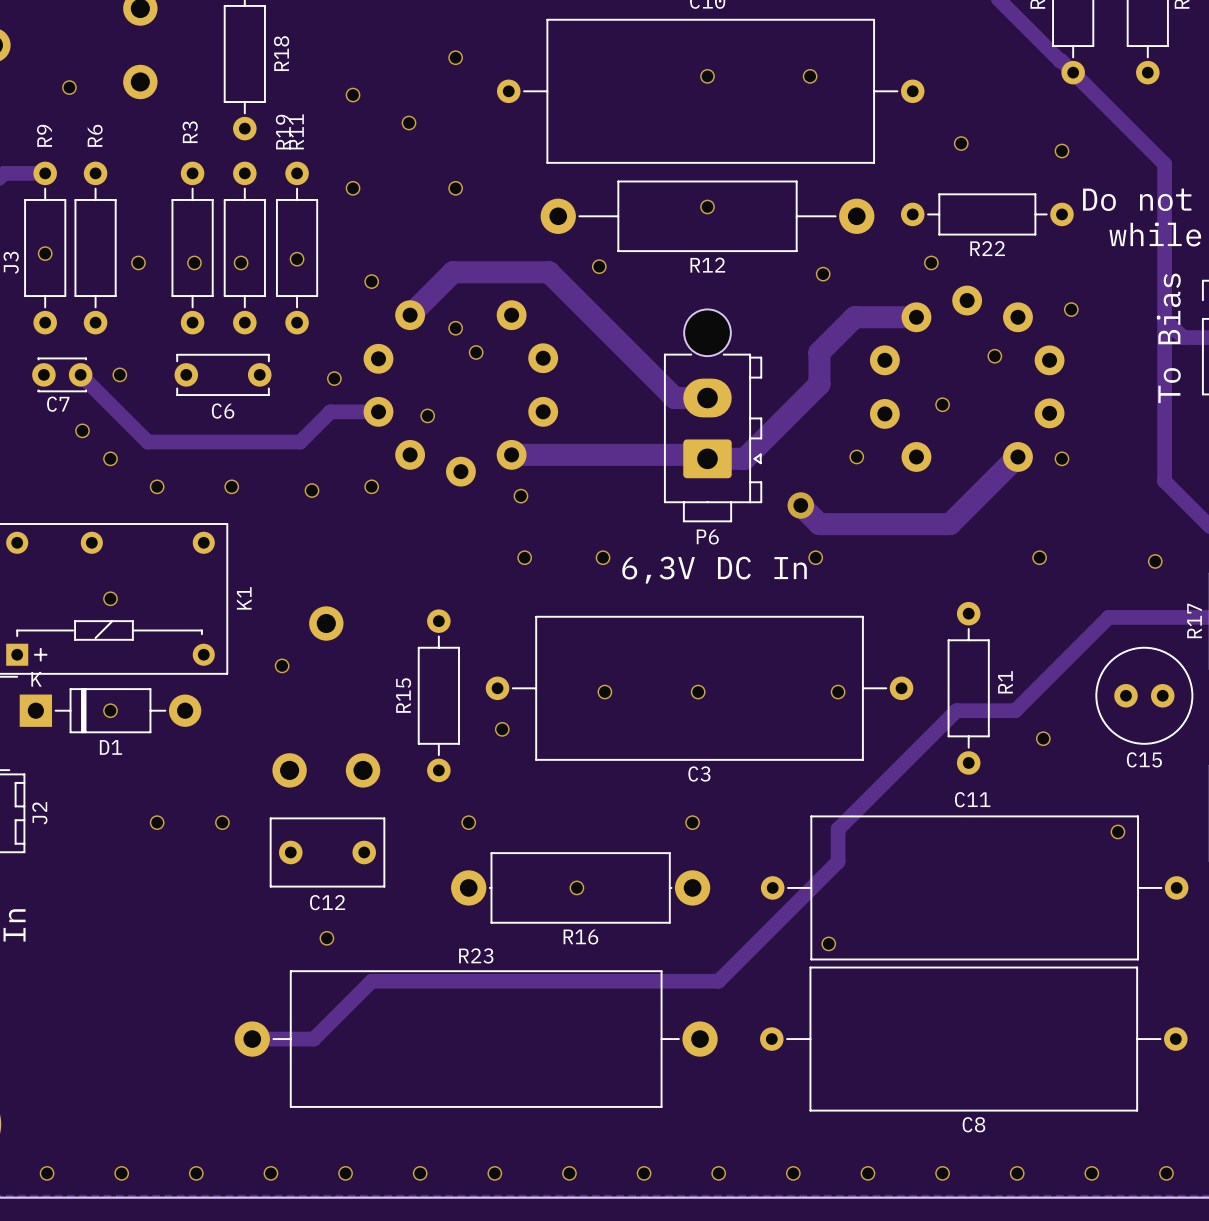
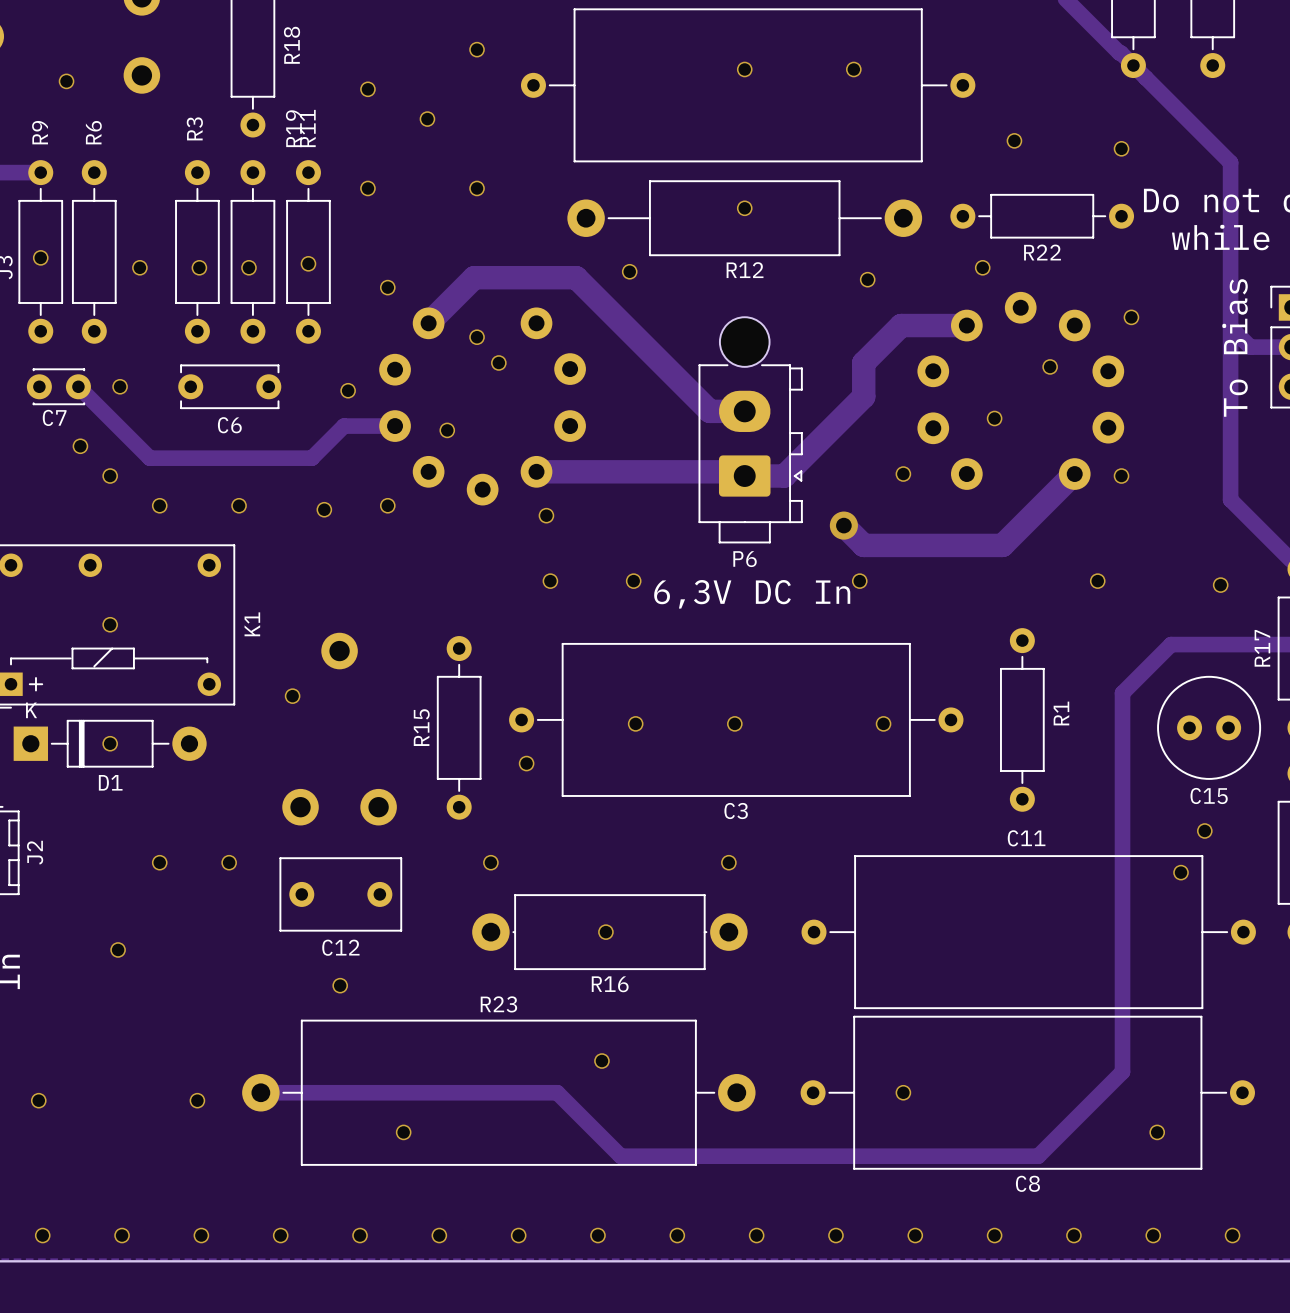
track: (1062, 663) (1015, 710) (956, 710) (838, 829) (838, 861) (718, 981) (371, 981) (313, 1039) -> (1122, 693) (1122, 1071) (1038, 1156) (620, 1156) (557, 1092) (326, 1092)
via: (1043, 738) -> none
via: none -> (1204, 830)
via: none -> (118, 949)
via: (828, 943) -> none
via: none -> (601, 1061)
via: none -> (903, 1092)
via: none -> (38, 1100)
via: none -> (197, 1100)
via: none -> (403, 1132)
via: none -> (1157, 1132)

